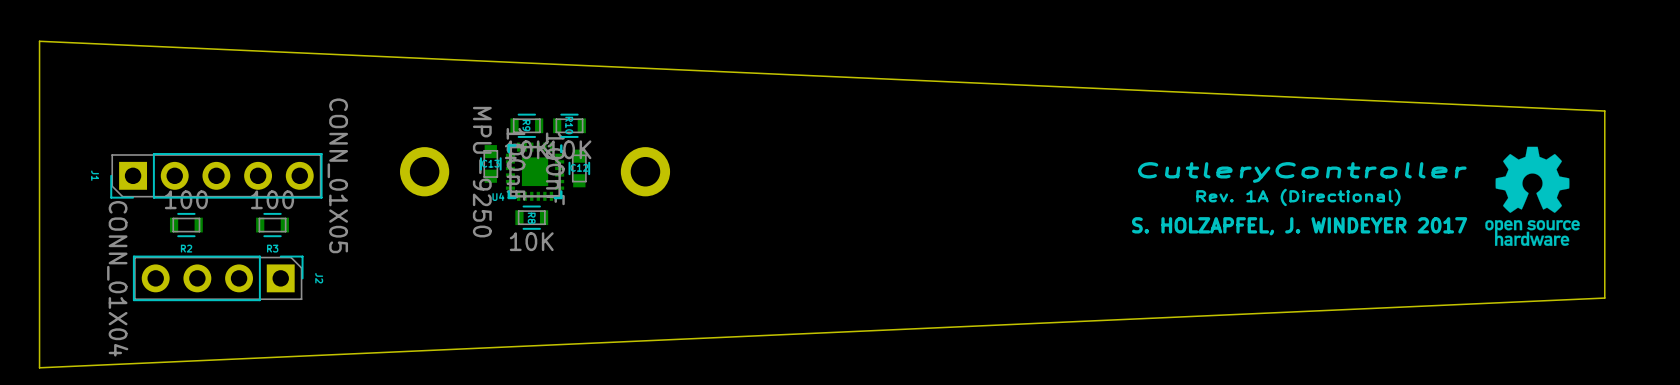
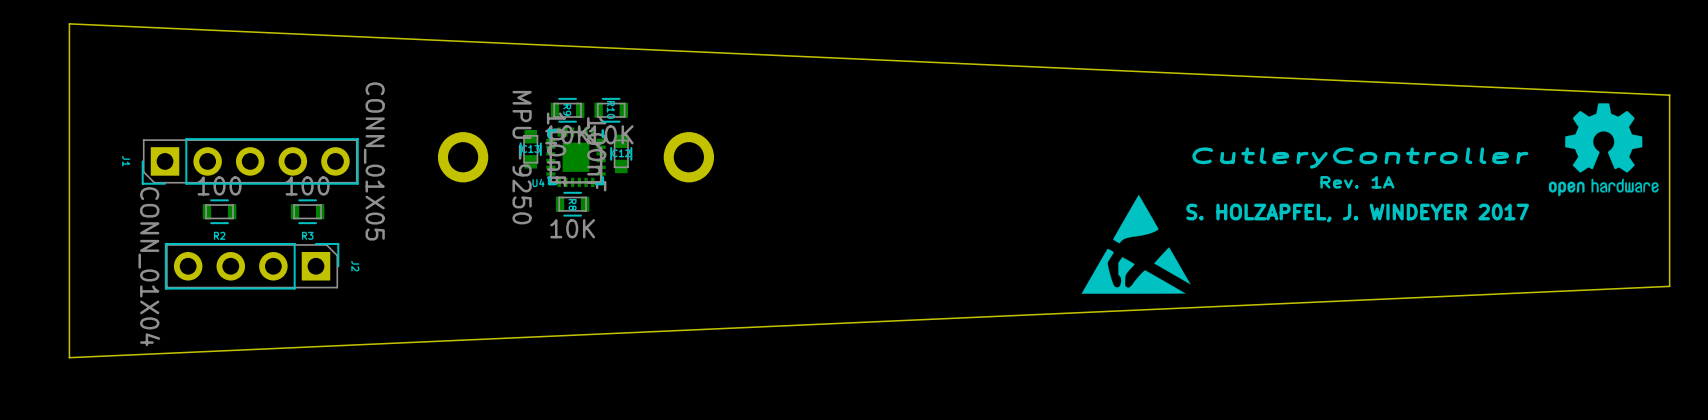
drawing: none -> [1548, 103, 1659, 197]
drawing: [1485, 146, 1580, 246] -> none
text: Rev. 1A (Directional) (1298, 197) -> Rev. 1A (1357, 182)
drawing: none -> [1081, 194, 1191, 294]

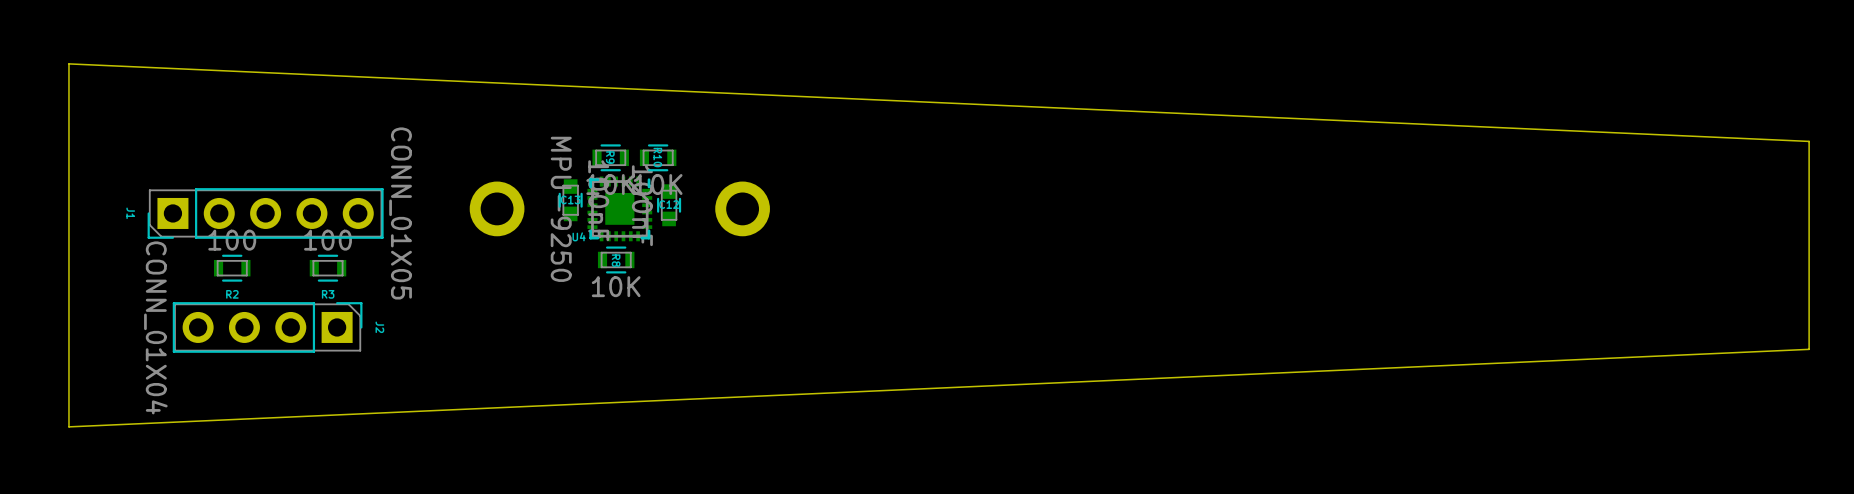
drawing: [1548, 103, 1659, 197] -> none
text: CutleryController (1360, 158) -> none
text: Rev. 1A (1357, 182) -> none
drawing: [1081, 194, 1191, 294] -> none
text: S. HOLZAPFEL, J. WINDEYER 2017 (1357, 212) -> none

